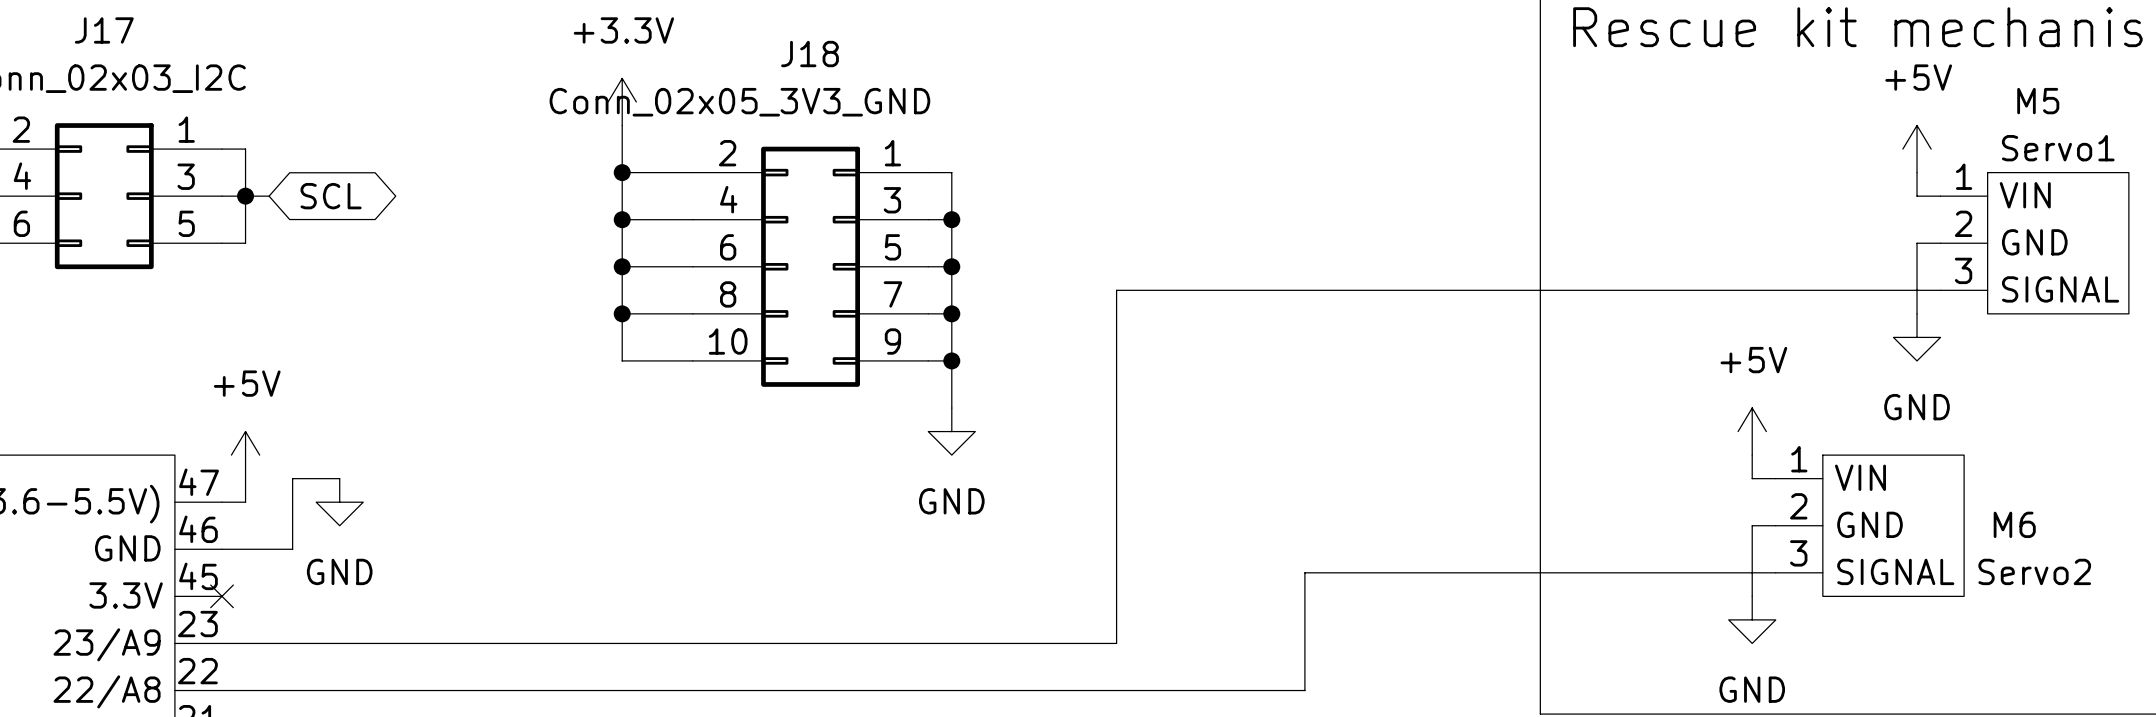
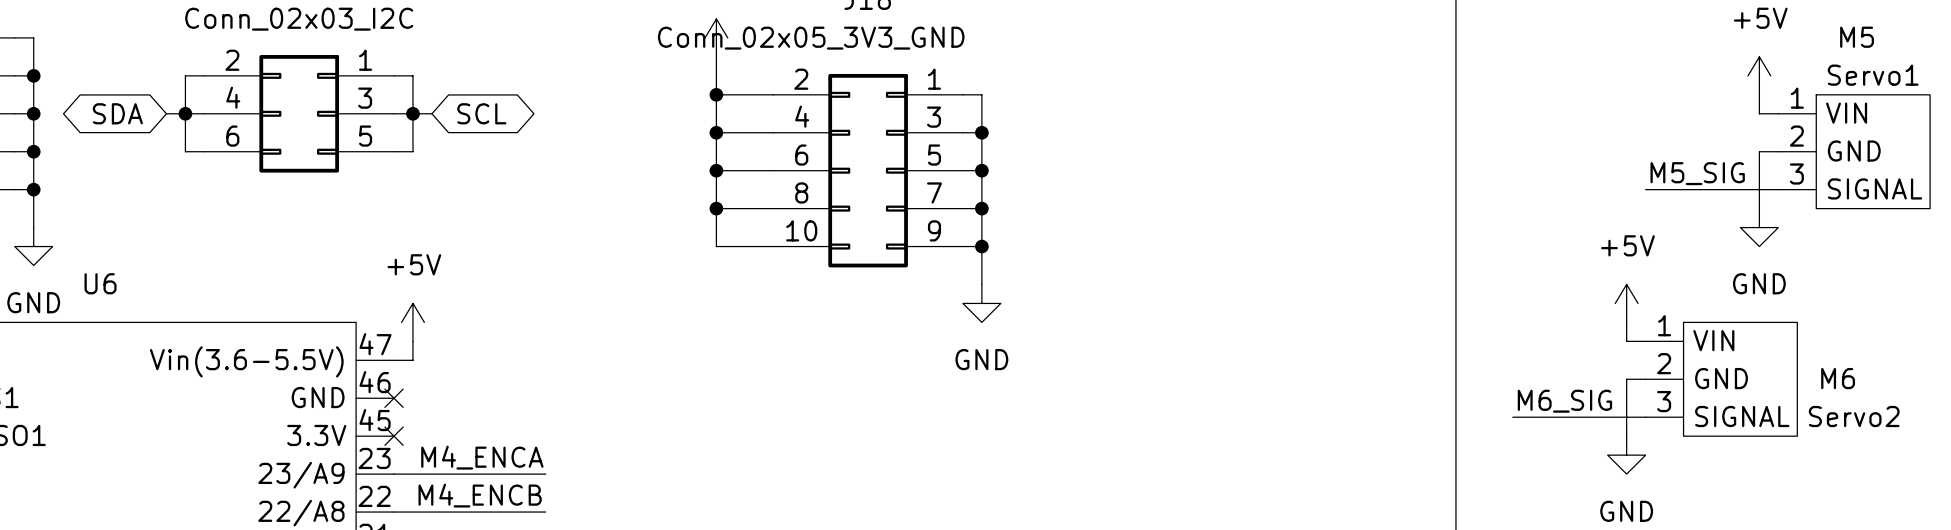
label: none -> M5_SIG (1697, 173)
wire: (1775, 290) (1116, 290) (1116, 643) (410, 643) -> none
wire: (339, 478) (292, 478) (292, 549) (222, 549) -> none
power symbol: GND (339, 502) -> none
no-connect mark: none -> (394, 398)
label: none -> M6_SIG (1564, 401)
wire: (1610, 572) (1304, 572) (1304, 690) (410, 690) -> none
label: none -> M4_ENCA (482, 457)
label: none -> M4_ENCB (480, 495)

